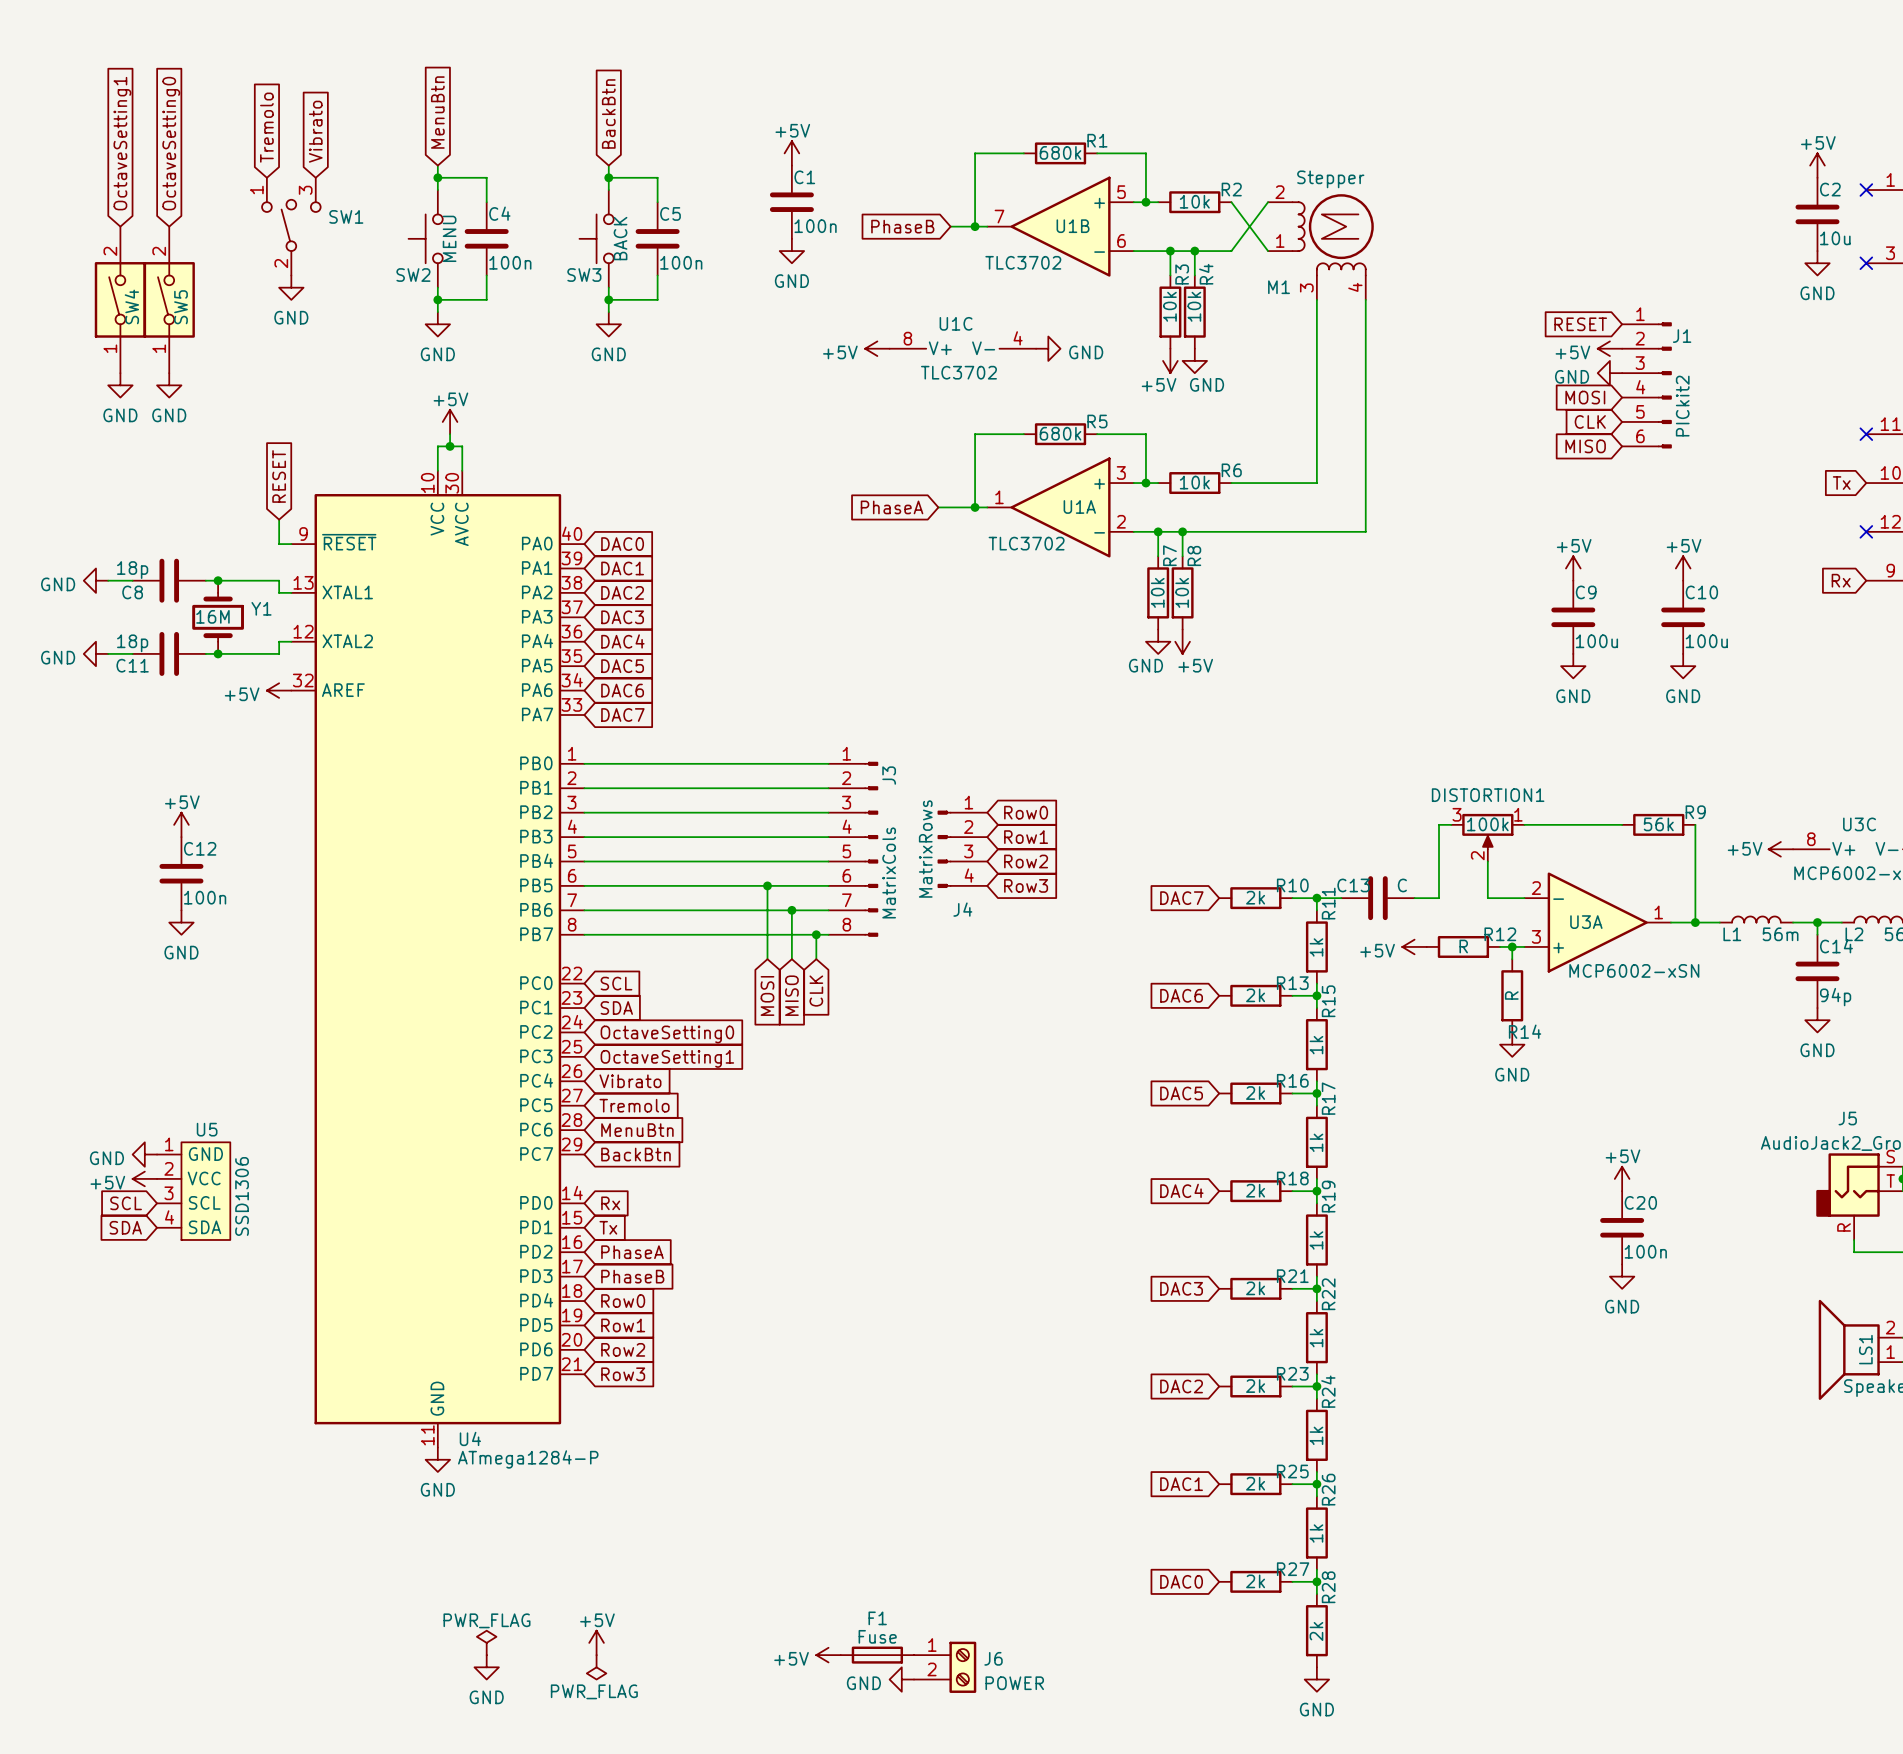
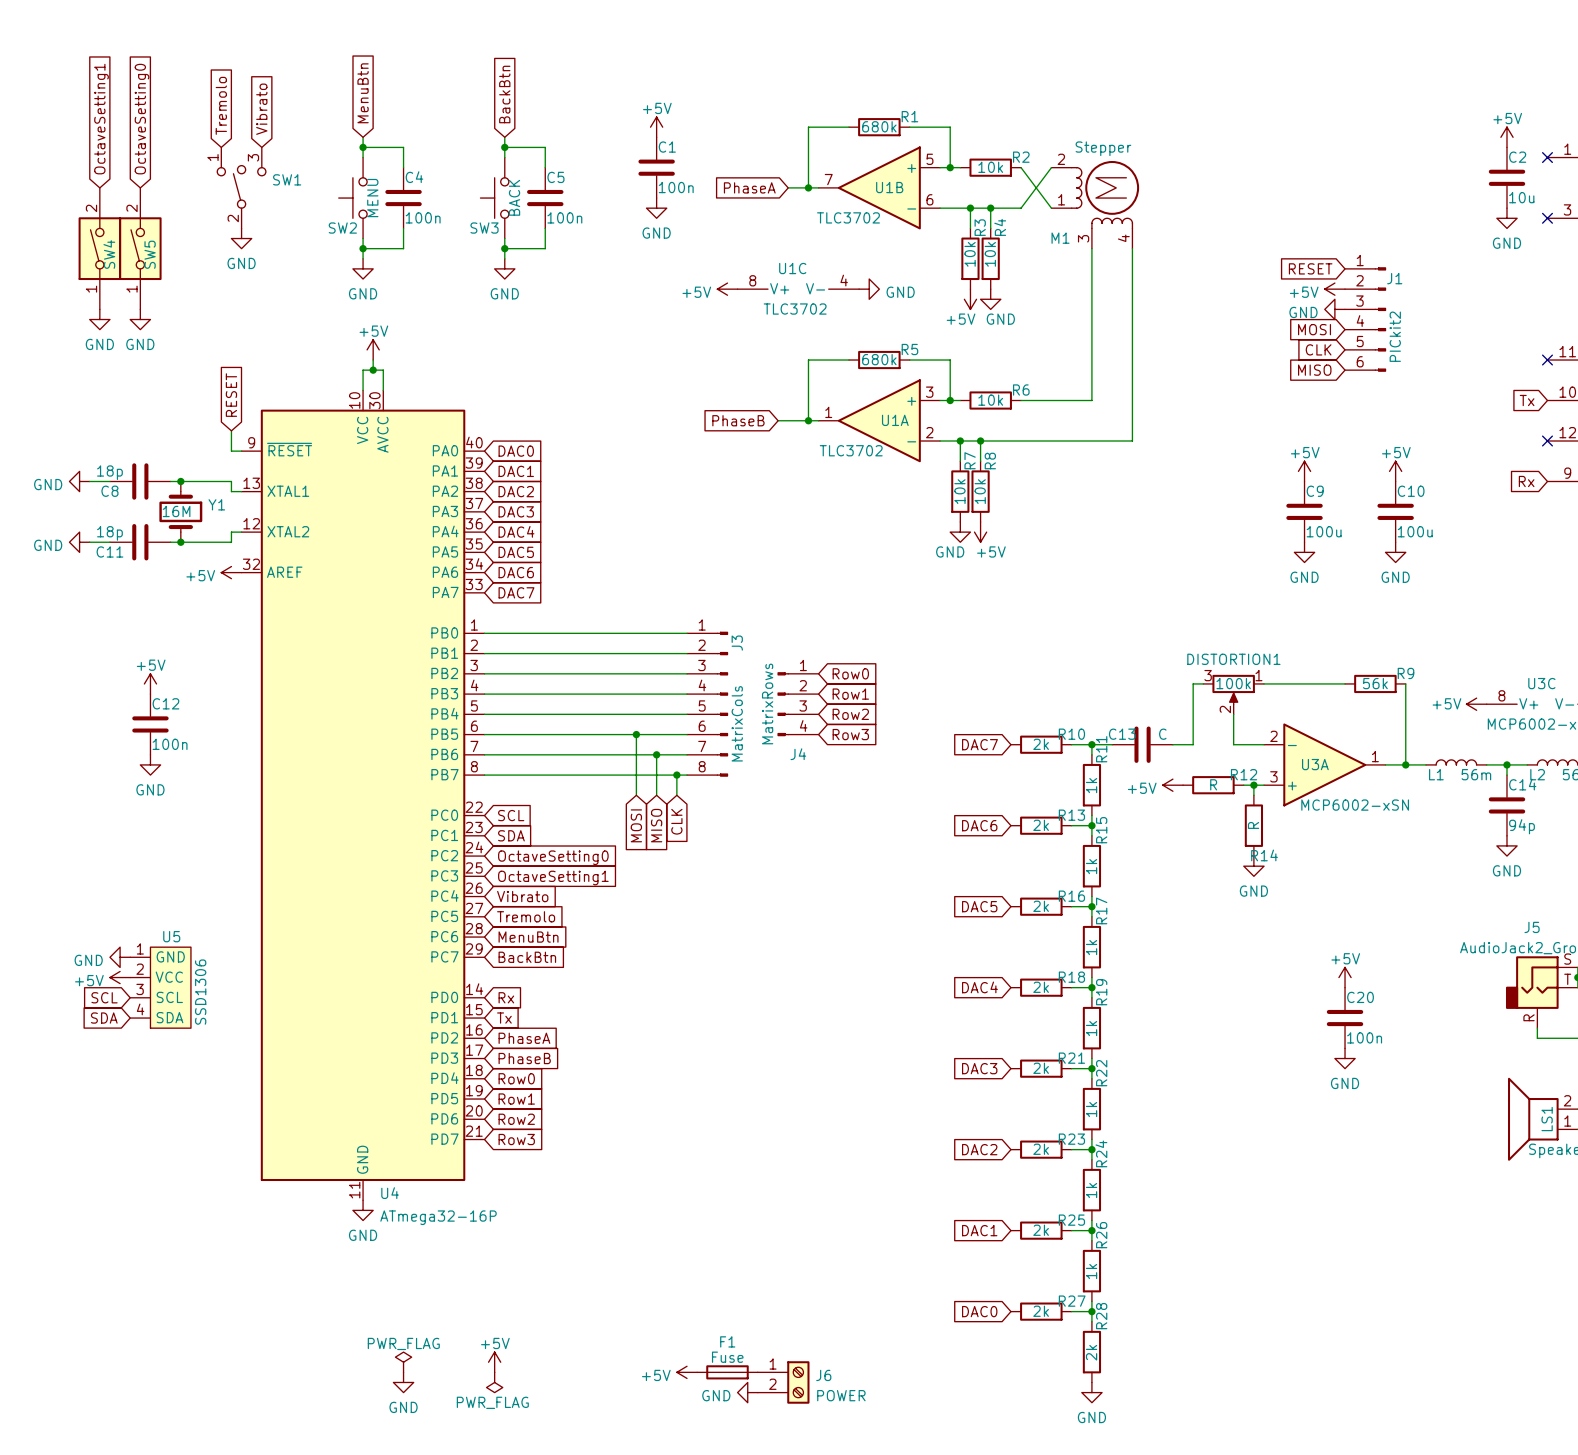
global label: PhaseB (902, 226) -> PhaseA (749, 187)
global label: PhaseA (892, 507) -> PhaseB (738, 420)
U4 value: ATmega1284-P (528, 1459) -> ATmega32-16P (438, 1217)

